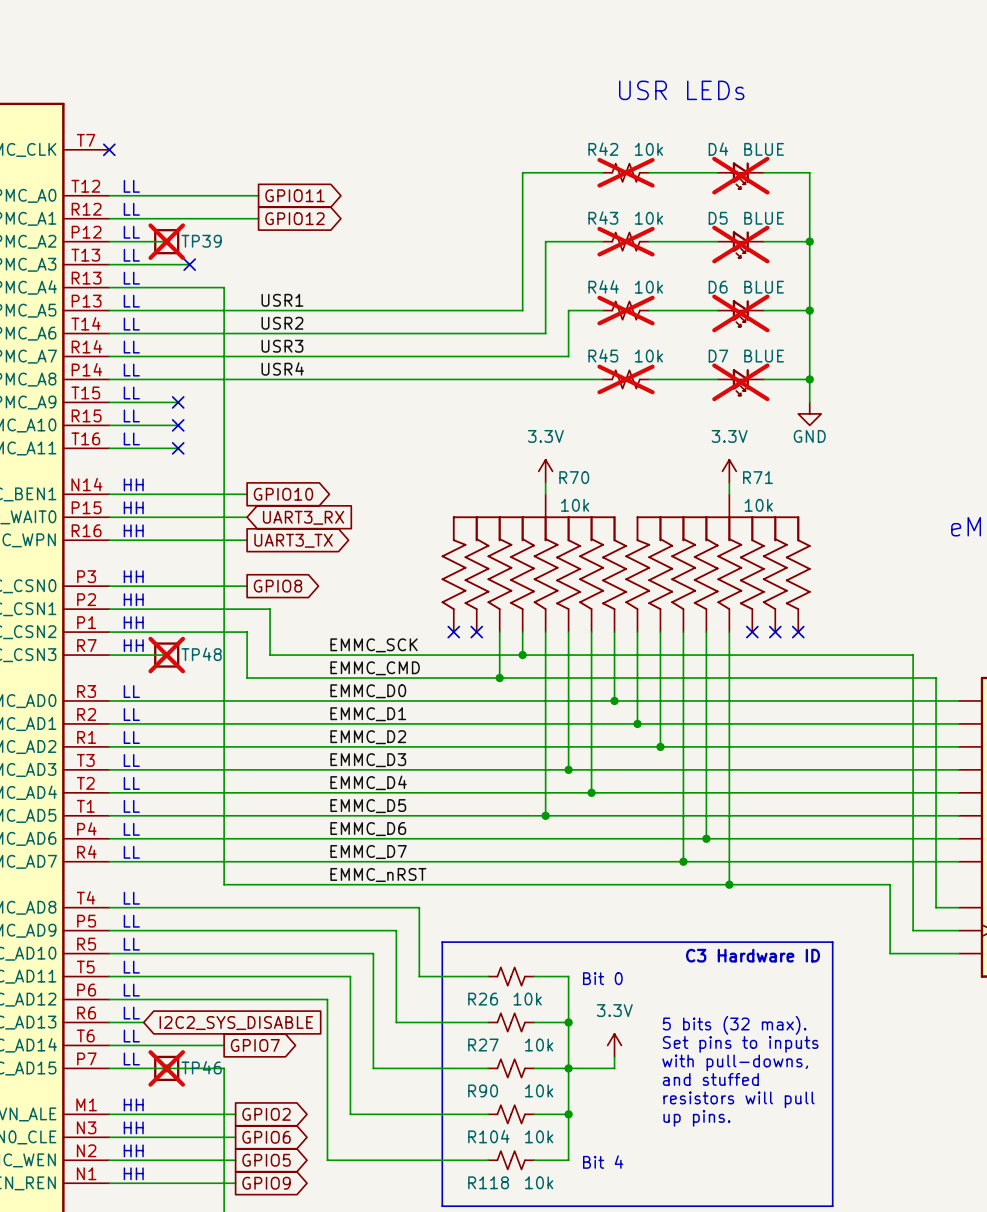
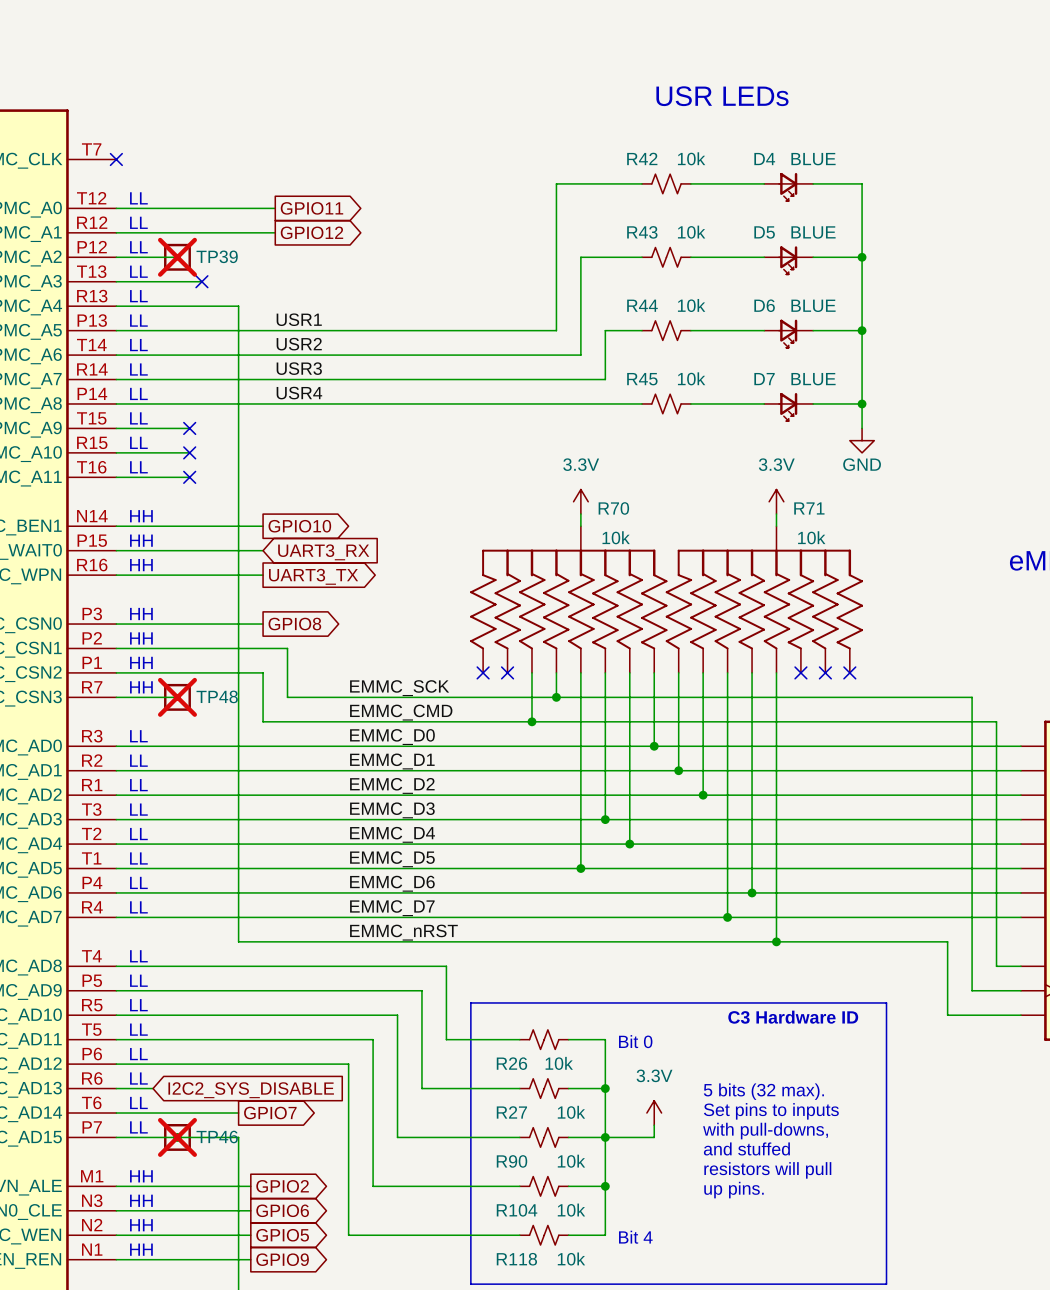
R42 do-not-place cross: (626, 172) -> none
D4 do-not-place cross: (740, 175) -> none
R43 do-not-place cross: (626, 241) -> none
D5 do-not-place cross: (740, 244) -> none
R44 do-not-place cross: (626, 310) -> none
D6 do-not-place cross: (740, 313) -> none
R45 do-not-place cross: (626, 379) -> none
D7 do-not-place cross: (740, 382) -> none

